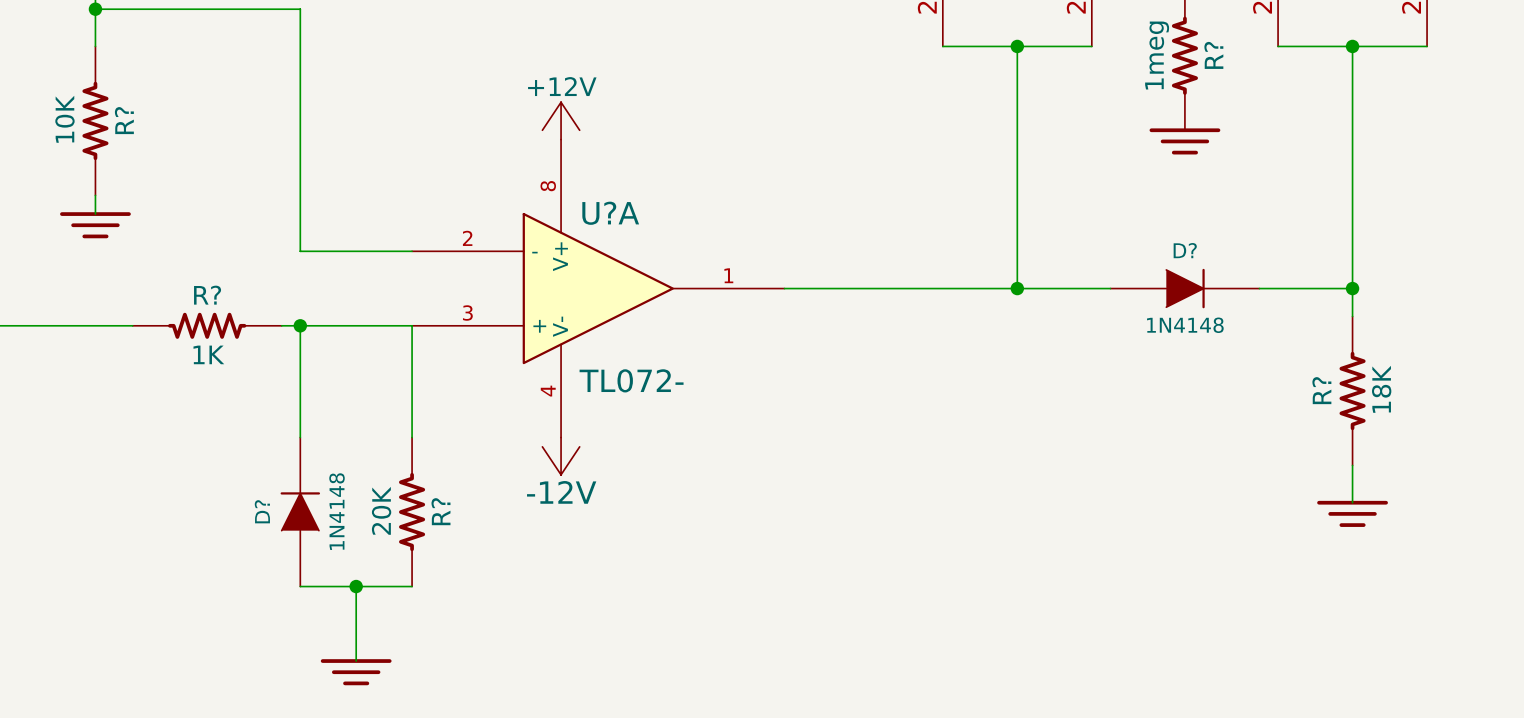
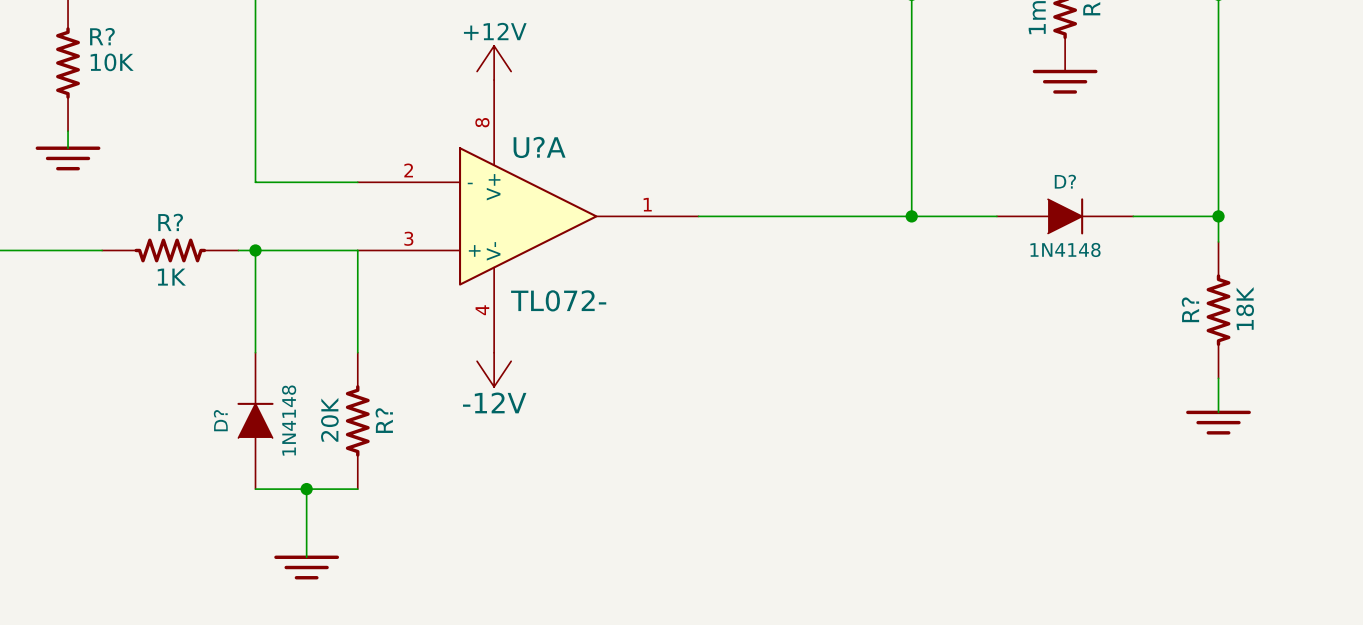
R? value rotation: 0° (64, 119) -> 90° clockwise (112, 62)
R? value position: 10K (64, 119) -> 10K (112, 62)
R? name rotation: 0° (124, 120) -> 90° clockwise (102, 36)

